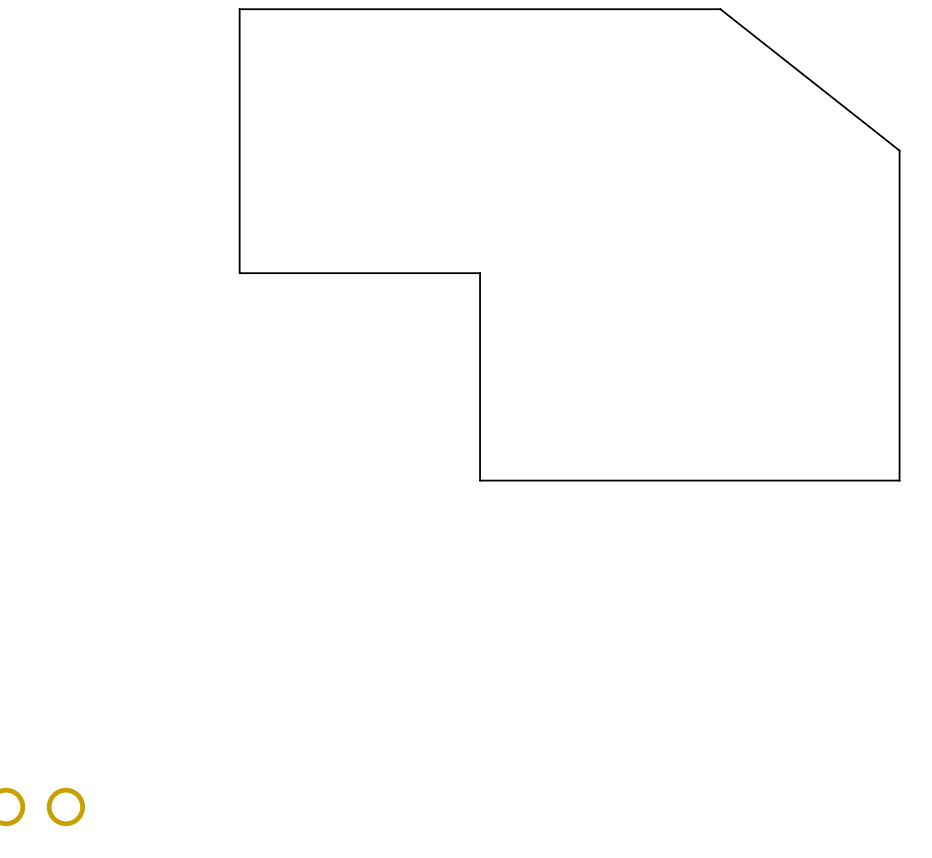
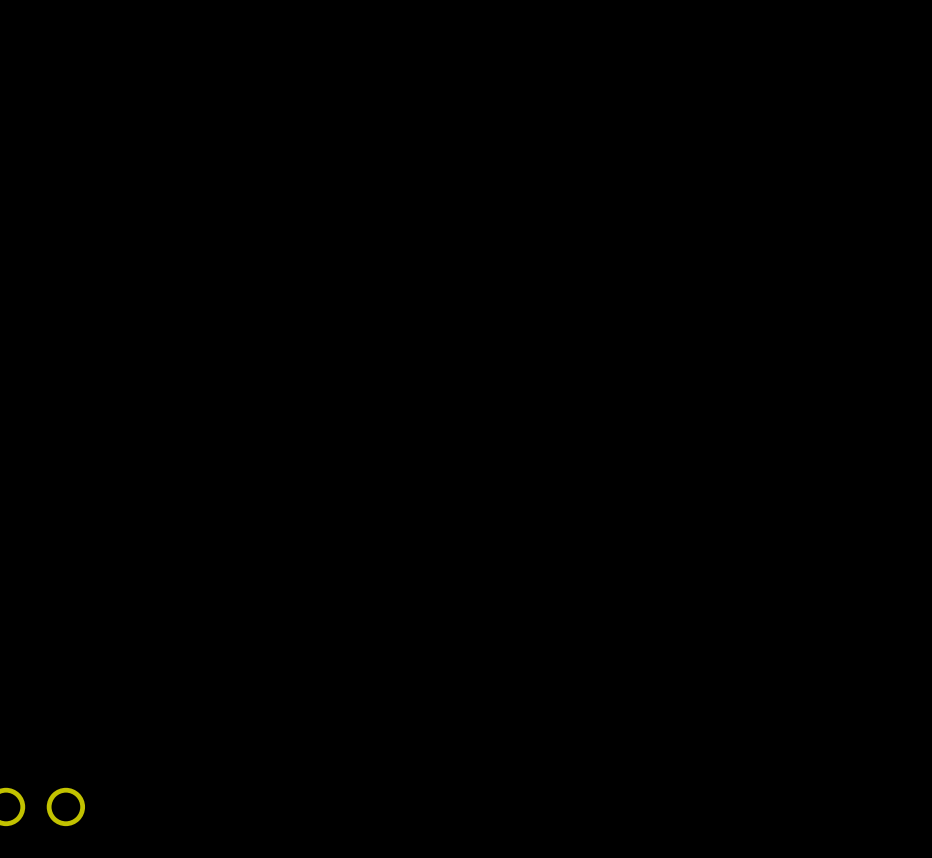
board edge: (720, 9) (239, 9) (239, 273) (480, 273) (480, 480) (899, 480) (899, 150) (720, 9) -> none

